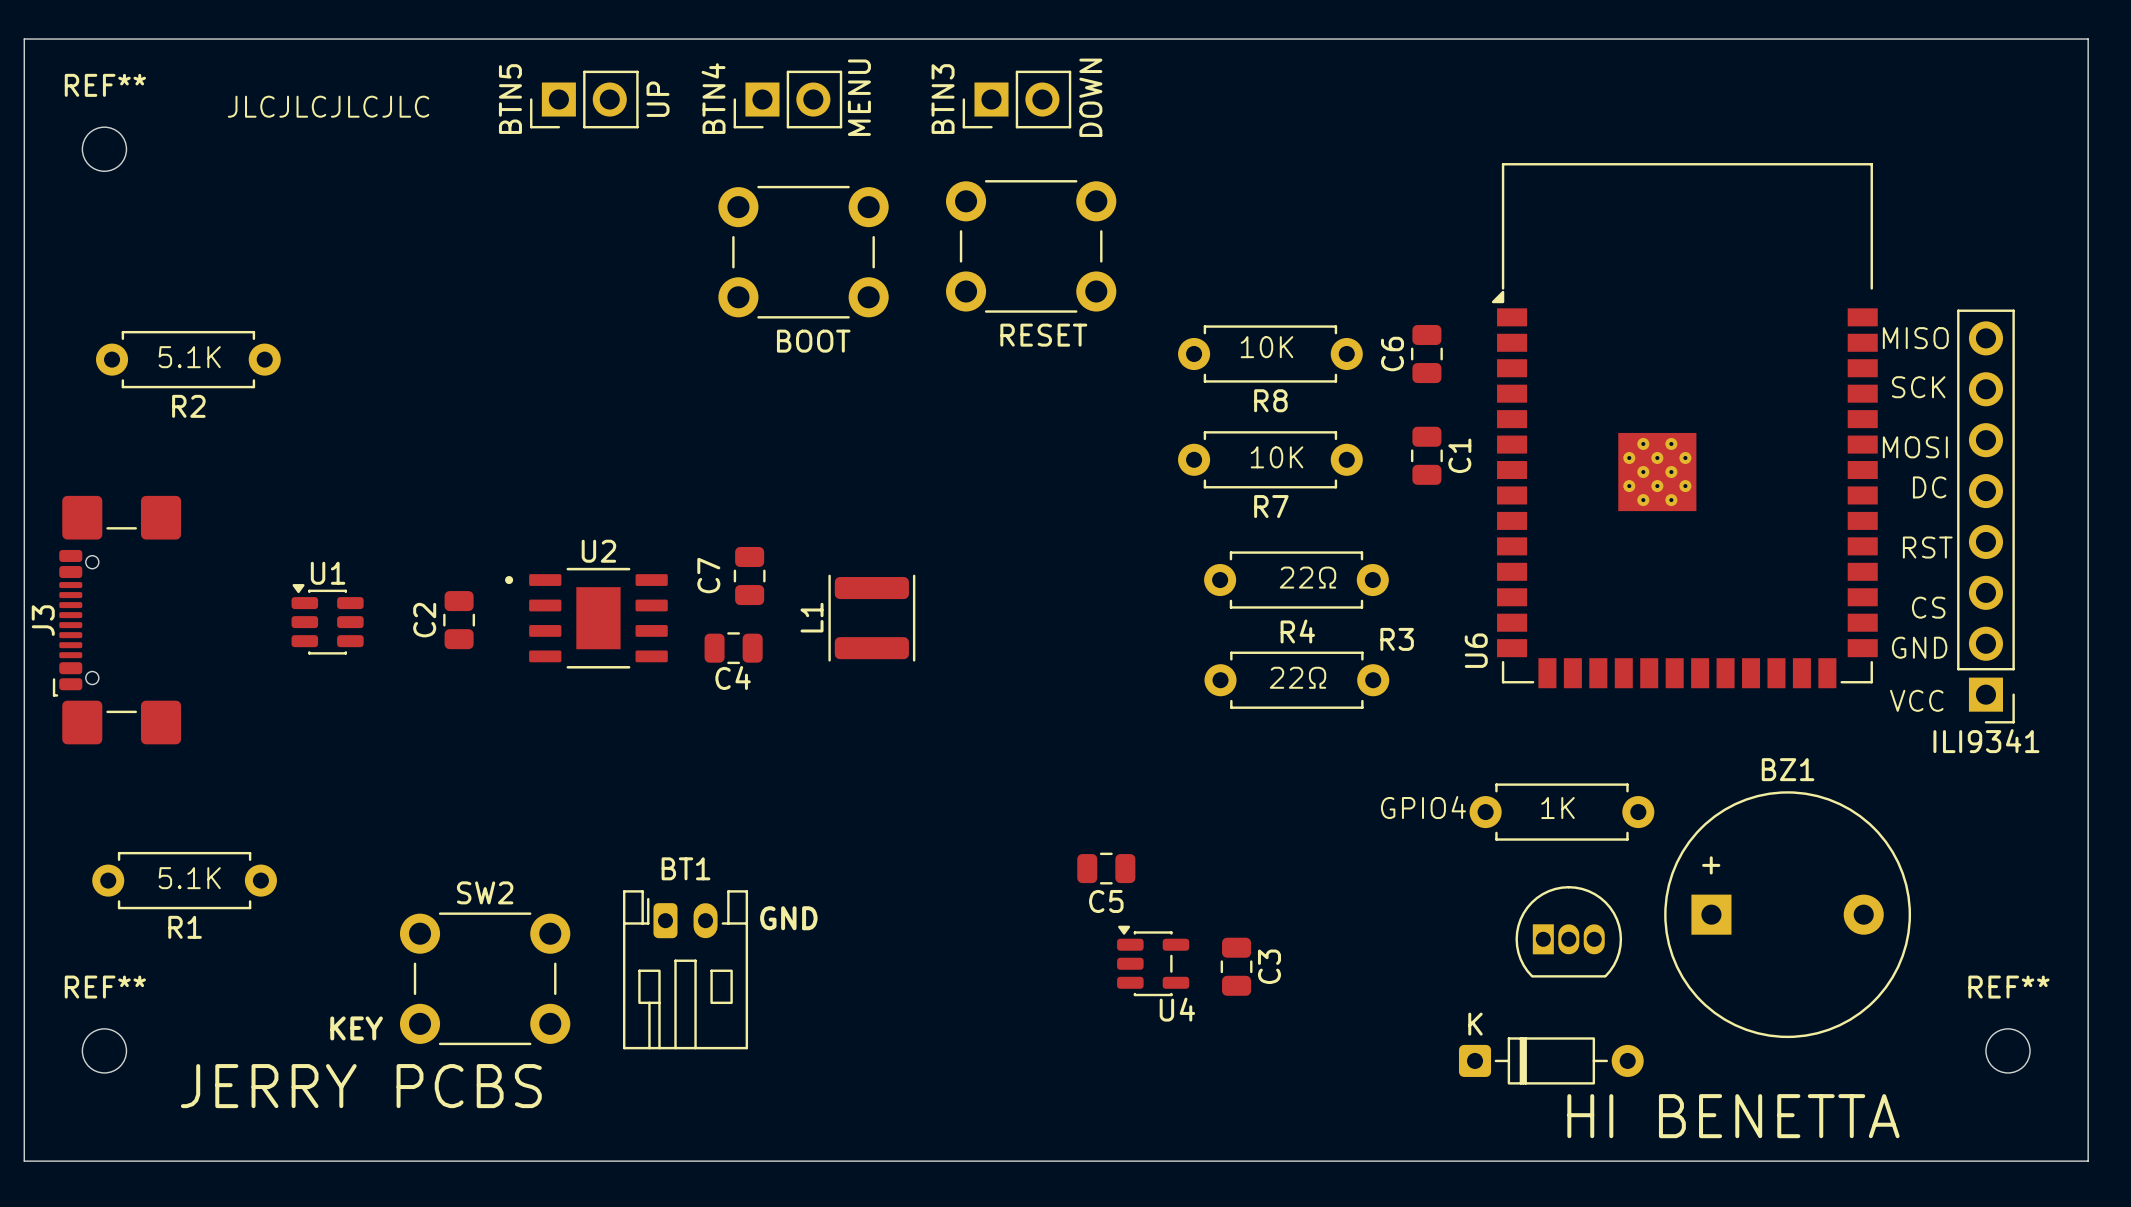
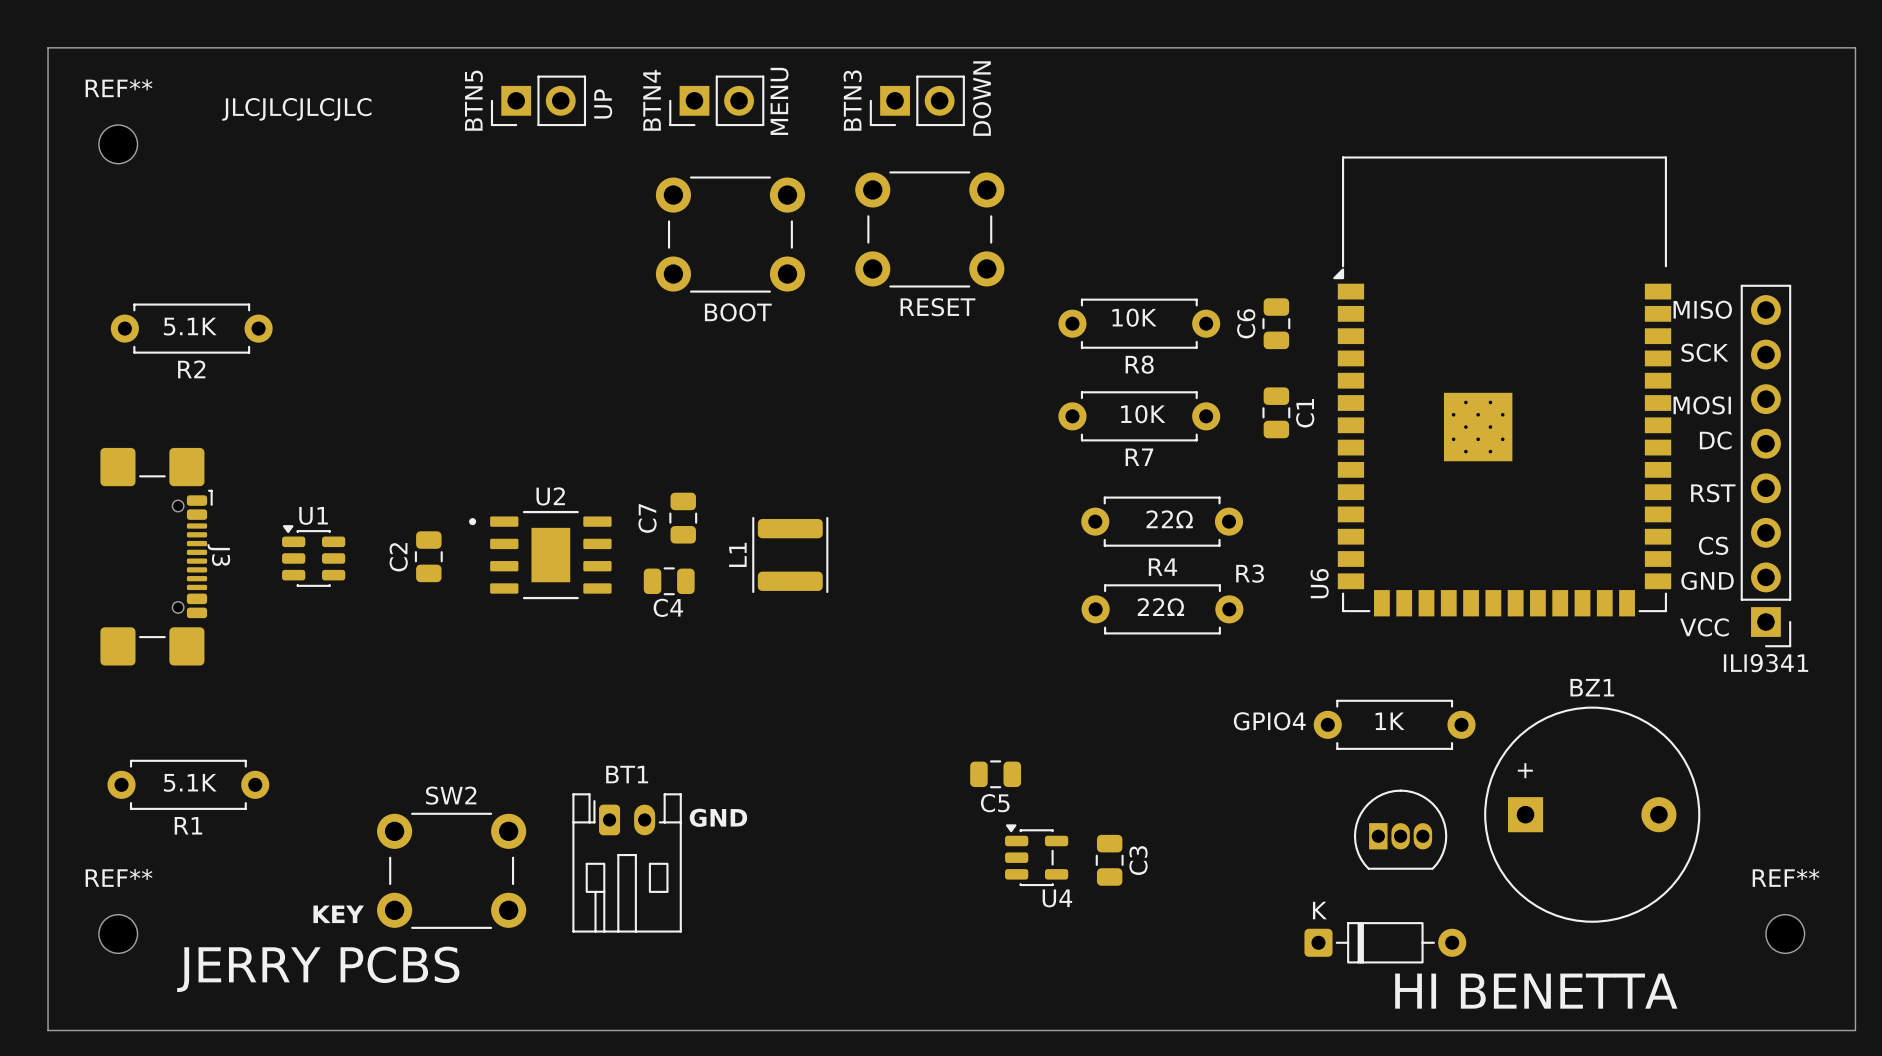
J3 rotation: 0° (116, 620) -> 180° (156, 556)

